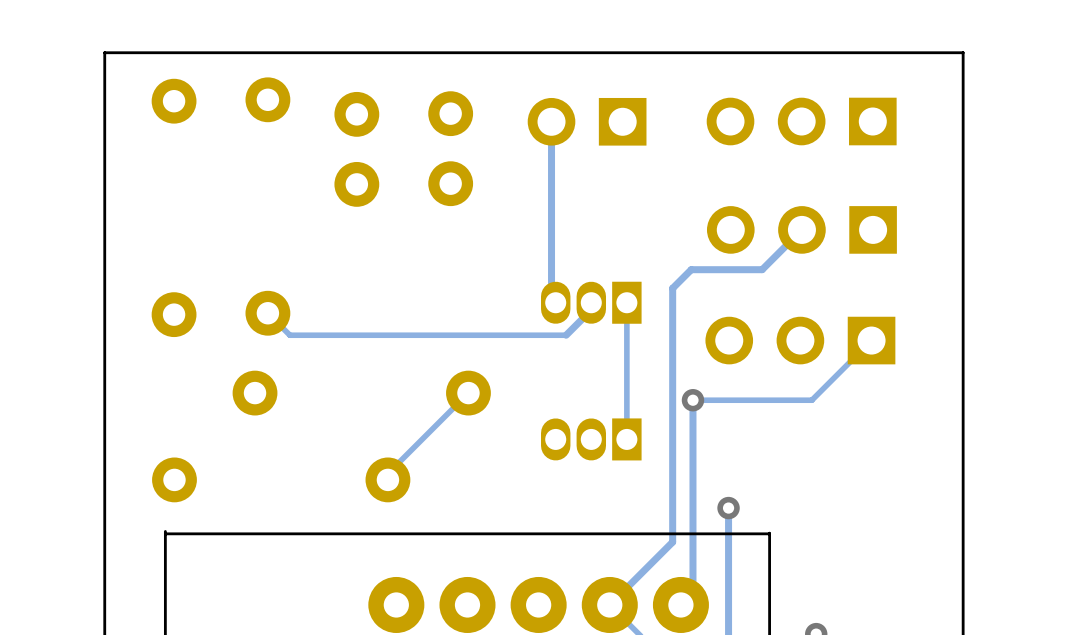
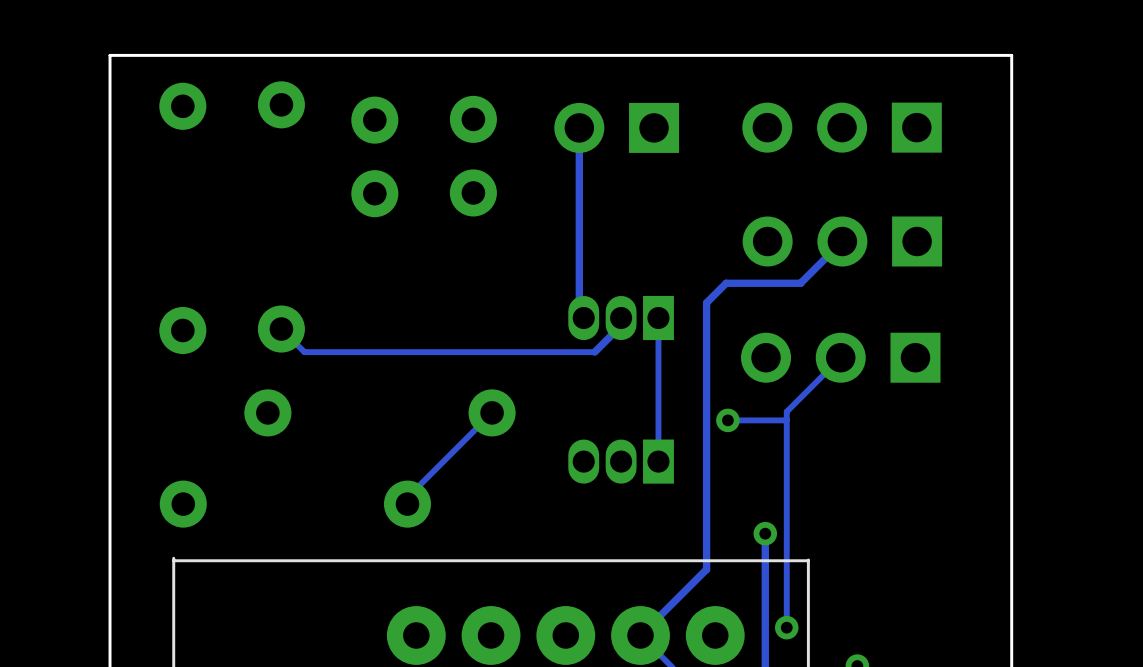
track: none -> (840, 357) (786, 411) (786, 627)
track: (871, 340) (811, 400) (749, 400) -> none
track: (692, 400) (692, 592) (680, 604) -> none
via: none -> (786, 627)

